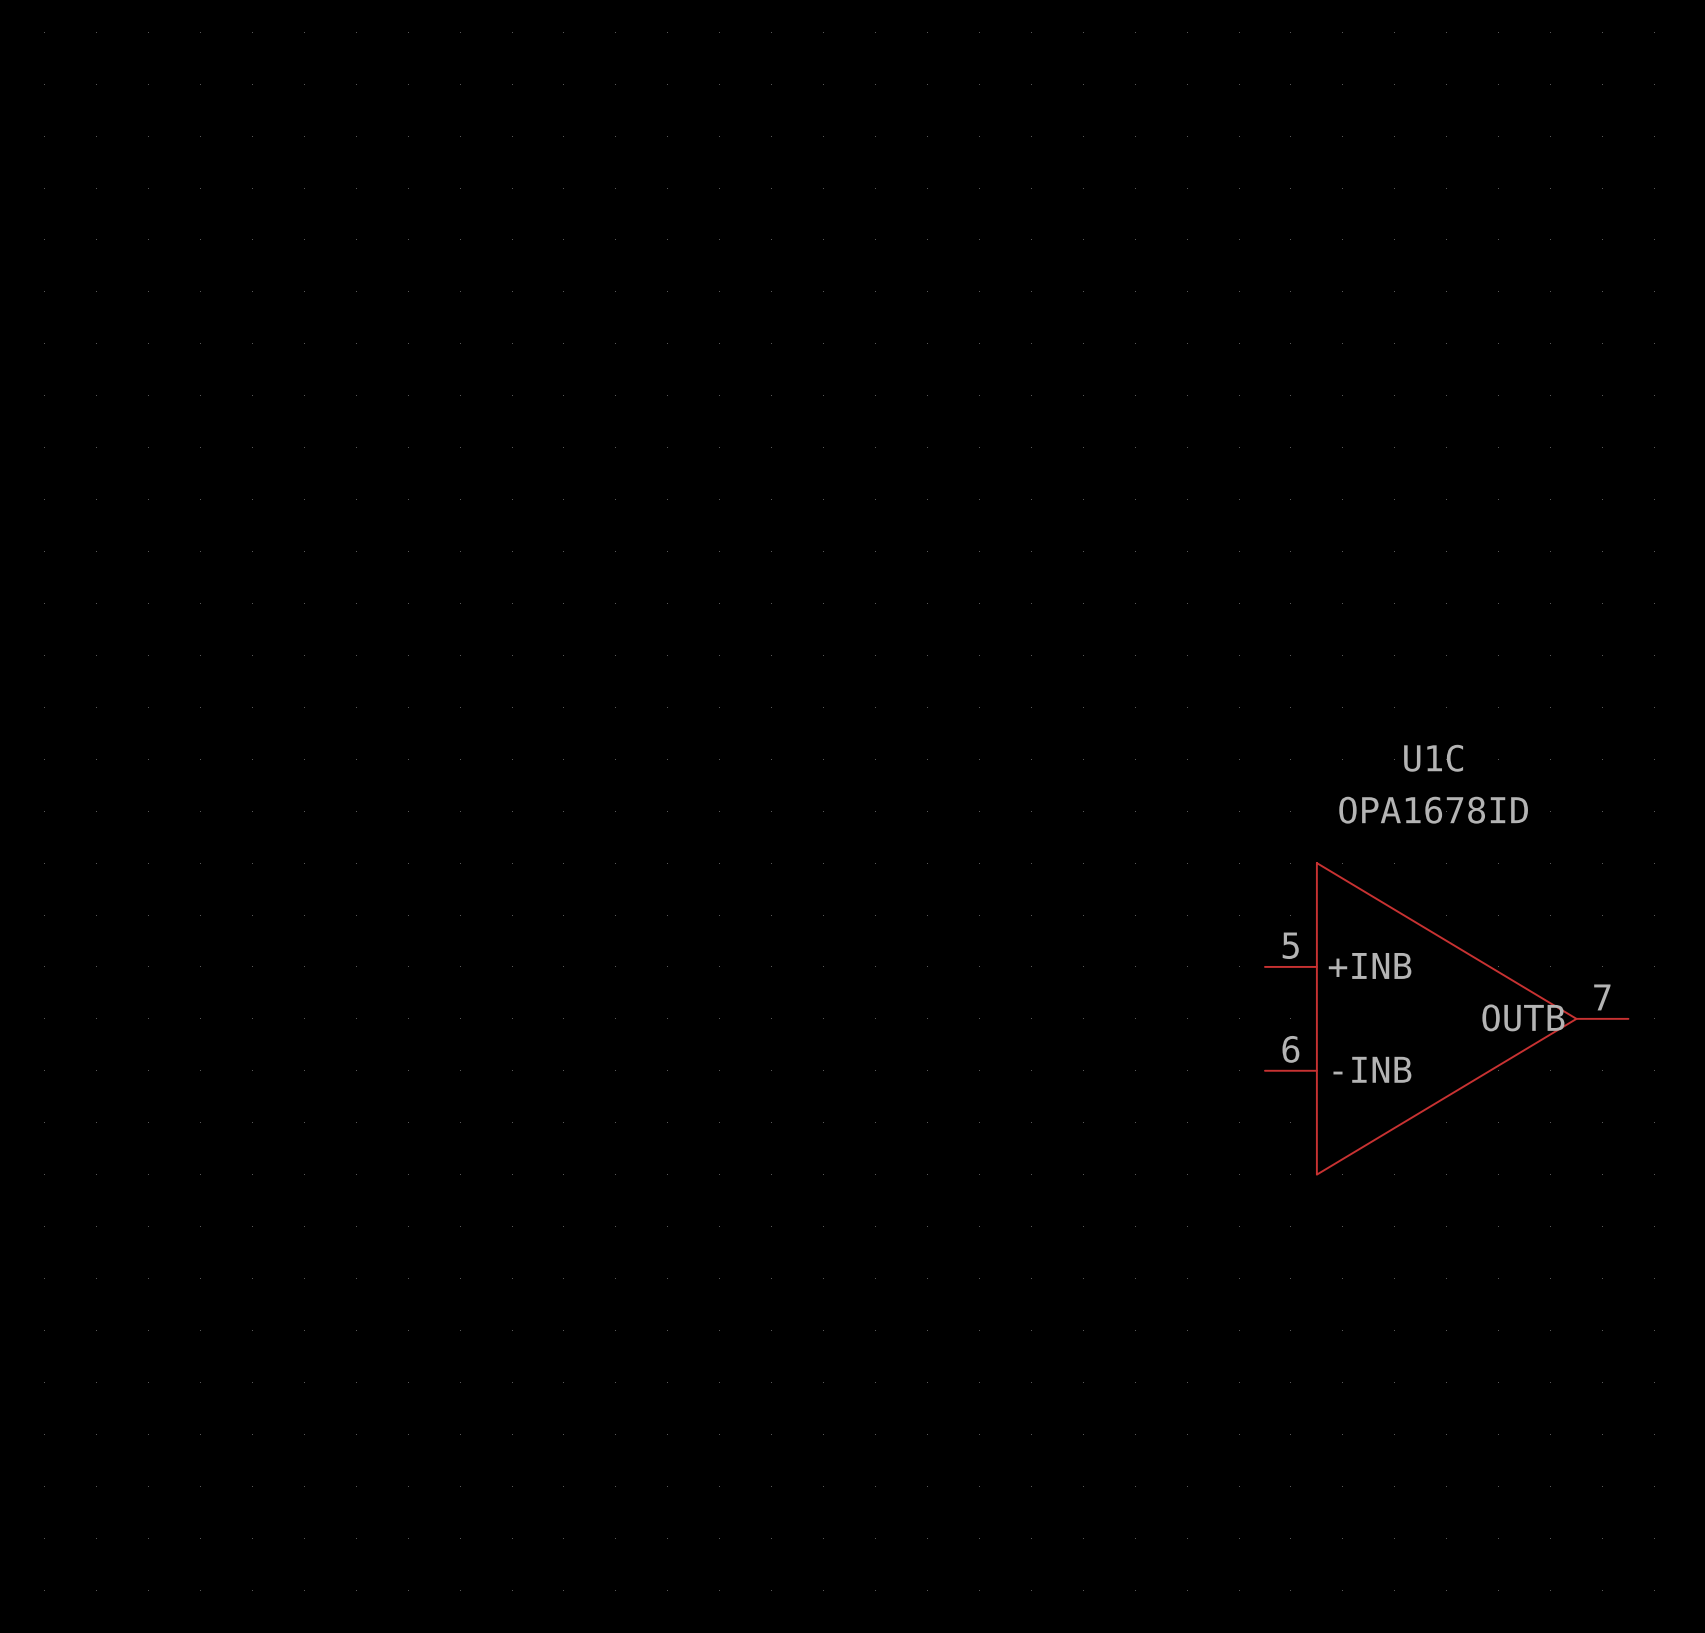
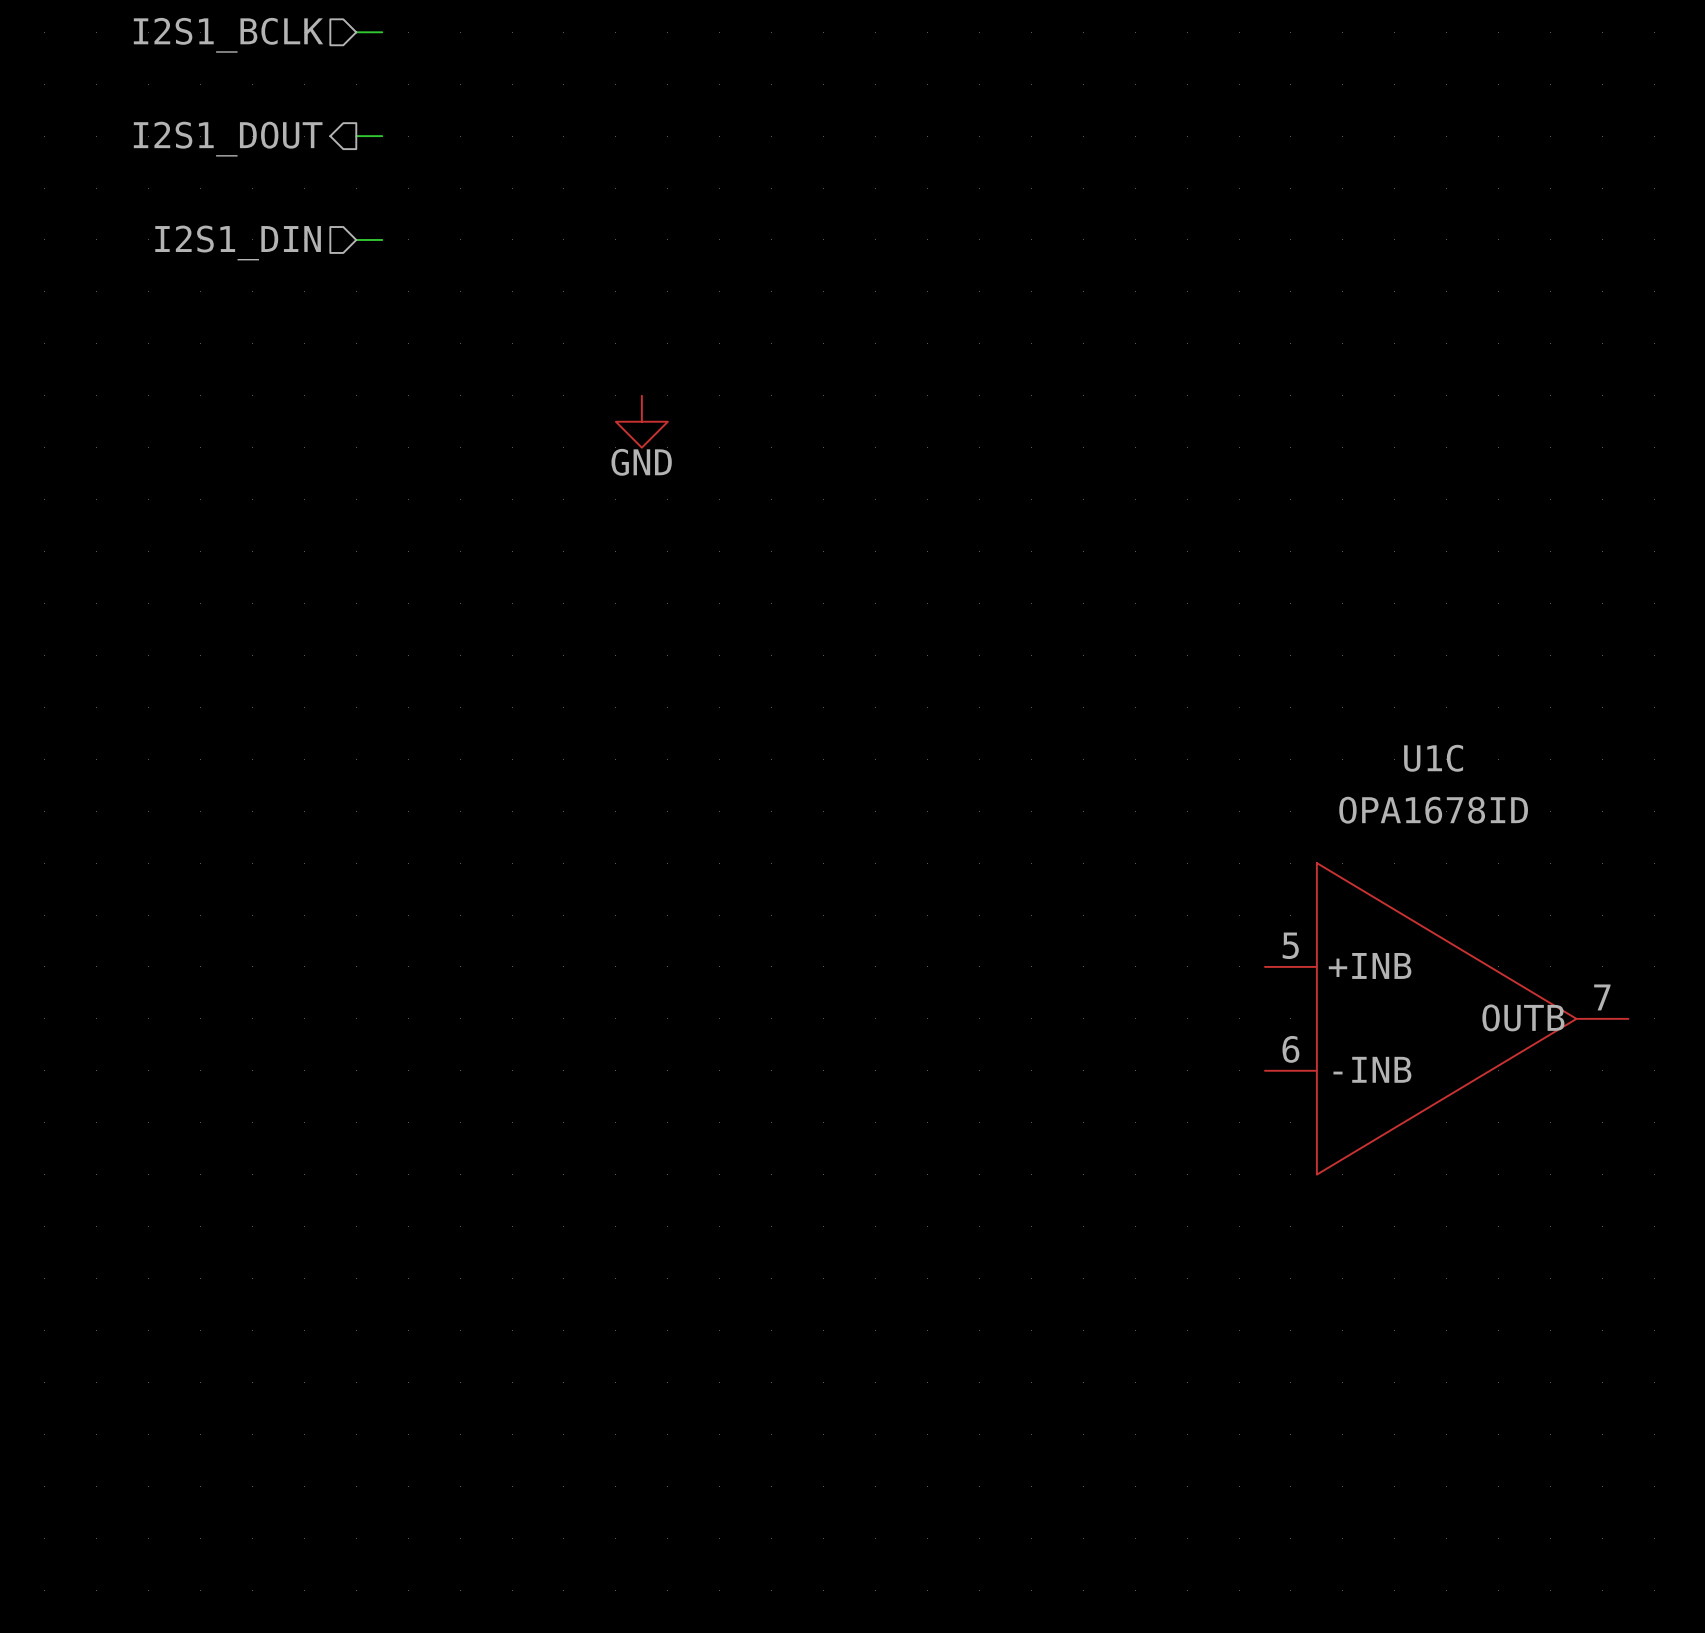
wire: none -> (356, 32) (382, 32)
hierarchical label: none -> I2S1_BCLK (228, 35)
wire: none -> (356, 136) (382, 136)
hierarchical label: none -> I2S1_DOUT (228, 139)
wire: none -> (356, 239) (382, 239)
hierarchical label: none -> I2S1_DIN (238, 242)
power symbol: none -> GND (641, 421)

